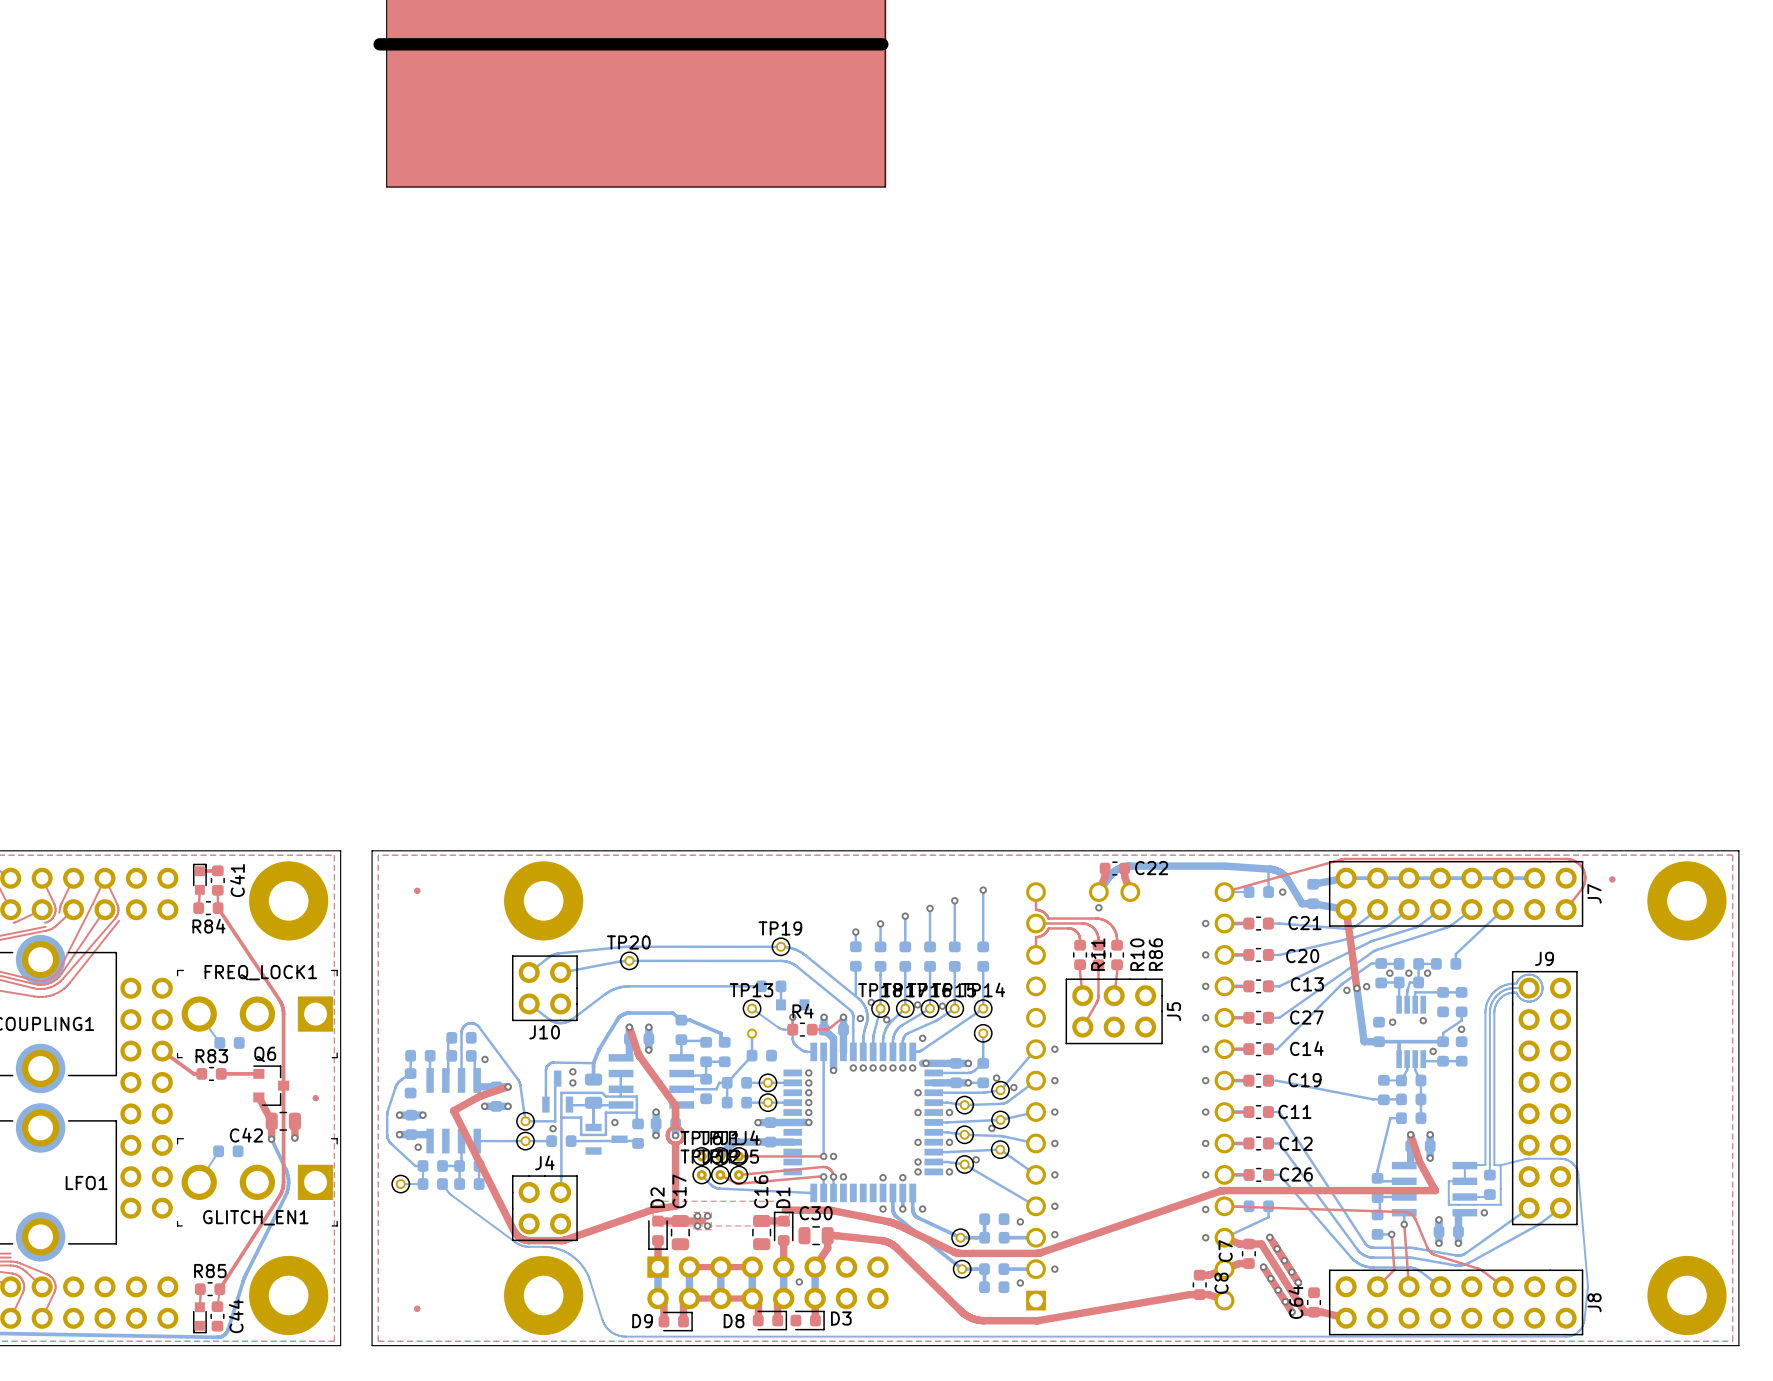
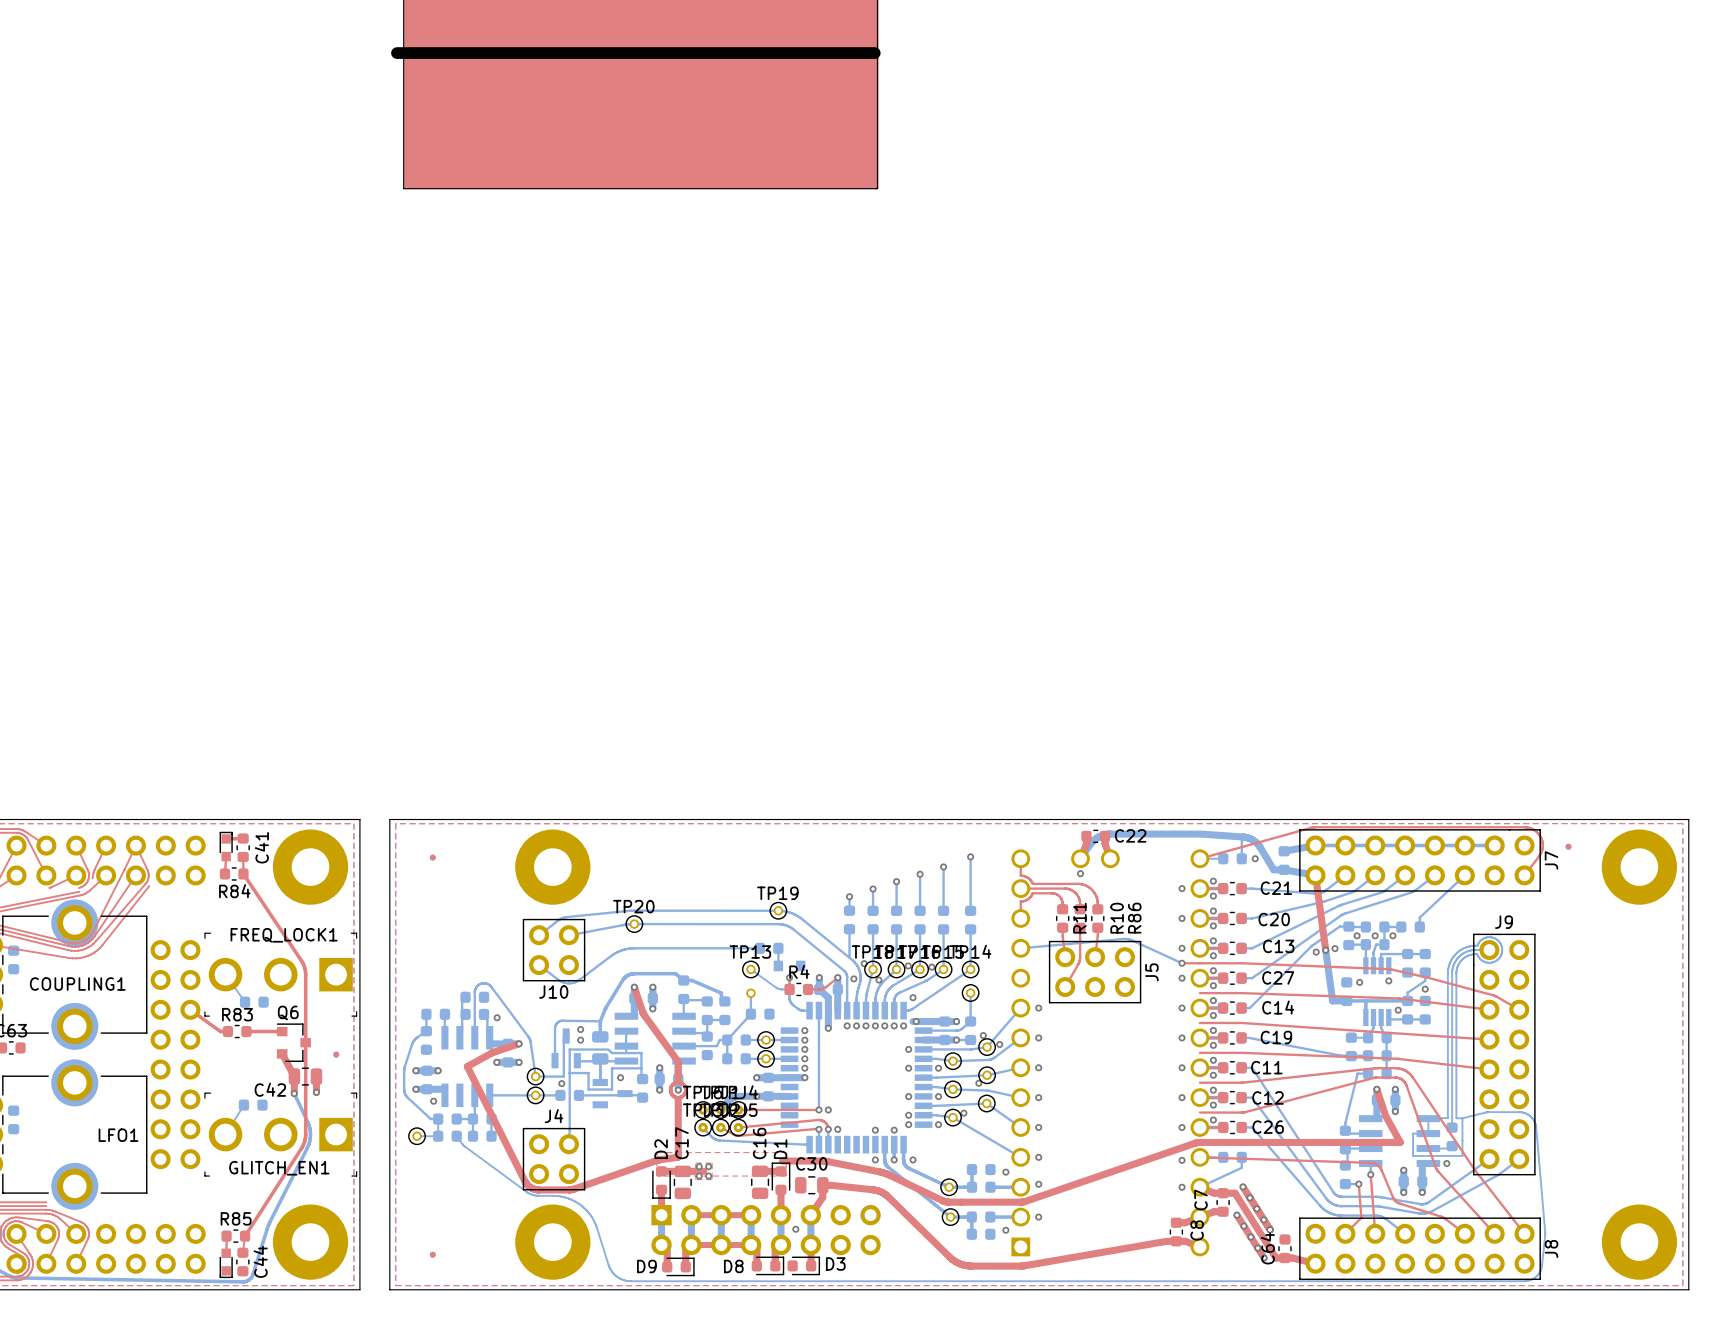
via: none -> (1213, 881)
via: none -> (1213, 896)
via: none -> (1213, 911)
via: none -> (1213, 925)
via: none -> (1213, 940)
bottom track: none -> (1020, 948) (1126, 939) (1182, 963)
via: none -> (1213, 955)
top track: none -> (1182, 963) (1241, 963)
via: none -> (1182, 963)
top track: none -> (1242, 963) (1389, 969) (1496, 996)
via: none -> (1213, 970)
via: none -> (1213, 985)
top track: none -> (1199, 993) (1241, 993)
top track: none -> (1242, 993) (1399, 998) (1489, 1009)
top track: none -> (1496, 996) (1519, 1009)
via: none -> (1213, 1000)
via: none -> (1213, 1015)
top track: none -> (1199, 1022) (1241, 1022)
top track: none -> (1242, 1023) (1489, 1039)
via: none -> (1213, 1030)
via: none -> (1213, 1045)
top track: none -> (1199, 1052) (1241, 1052)
top track: none -> (1242, 1052) (1397, 1058) (1489, 1069)
via: none -> (1213, 1060)
via: none -> (1213, 1075)
top track: none -> (1199, 1082) (1243, 1082) (1375, 1068) (1396, 1068) (1404, 1070) (1412, 1076) (1474, 1169) (1524, 1233)
via: none -> (1213, 1090)
via: none -> (1213, 1105)
top track: none -> (1199, 1112) (1244, 1112) (1374, 1077) (1399, 1078) (1406, 1084) (1437, 1169) (1494, 1233)
via: none -> (1213, 1120)

